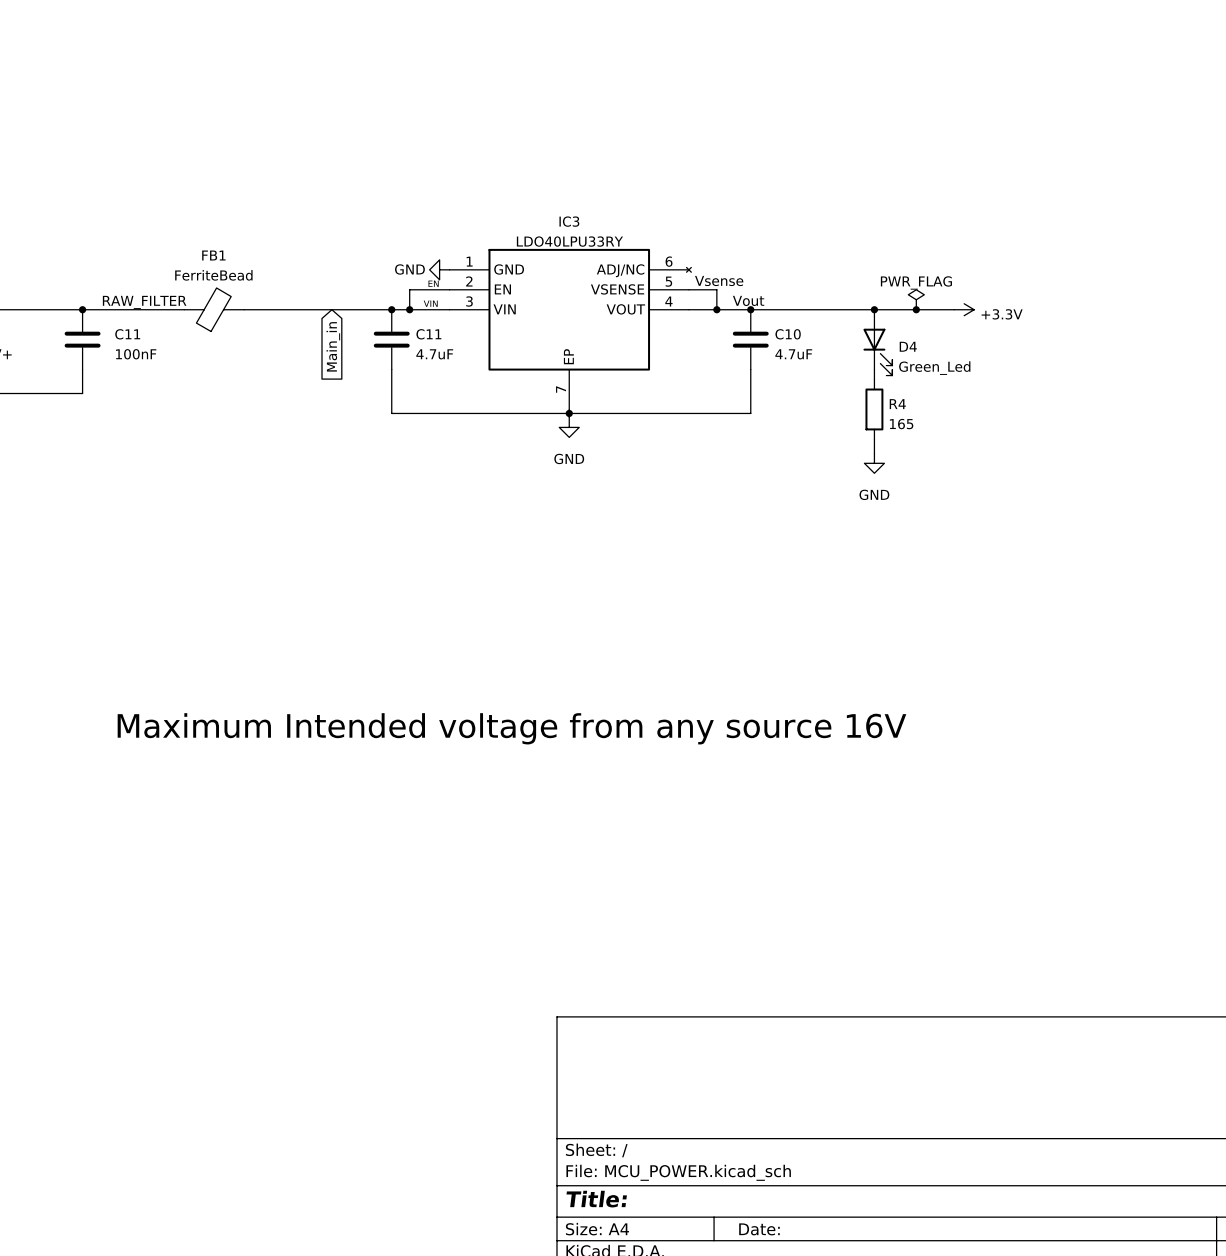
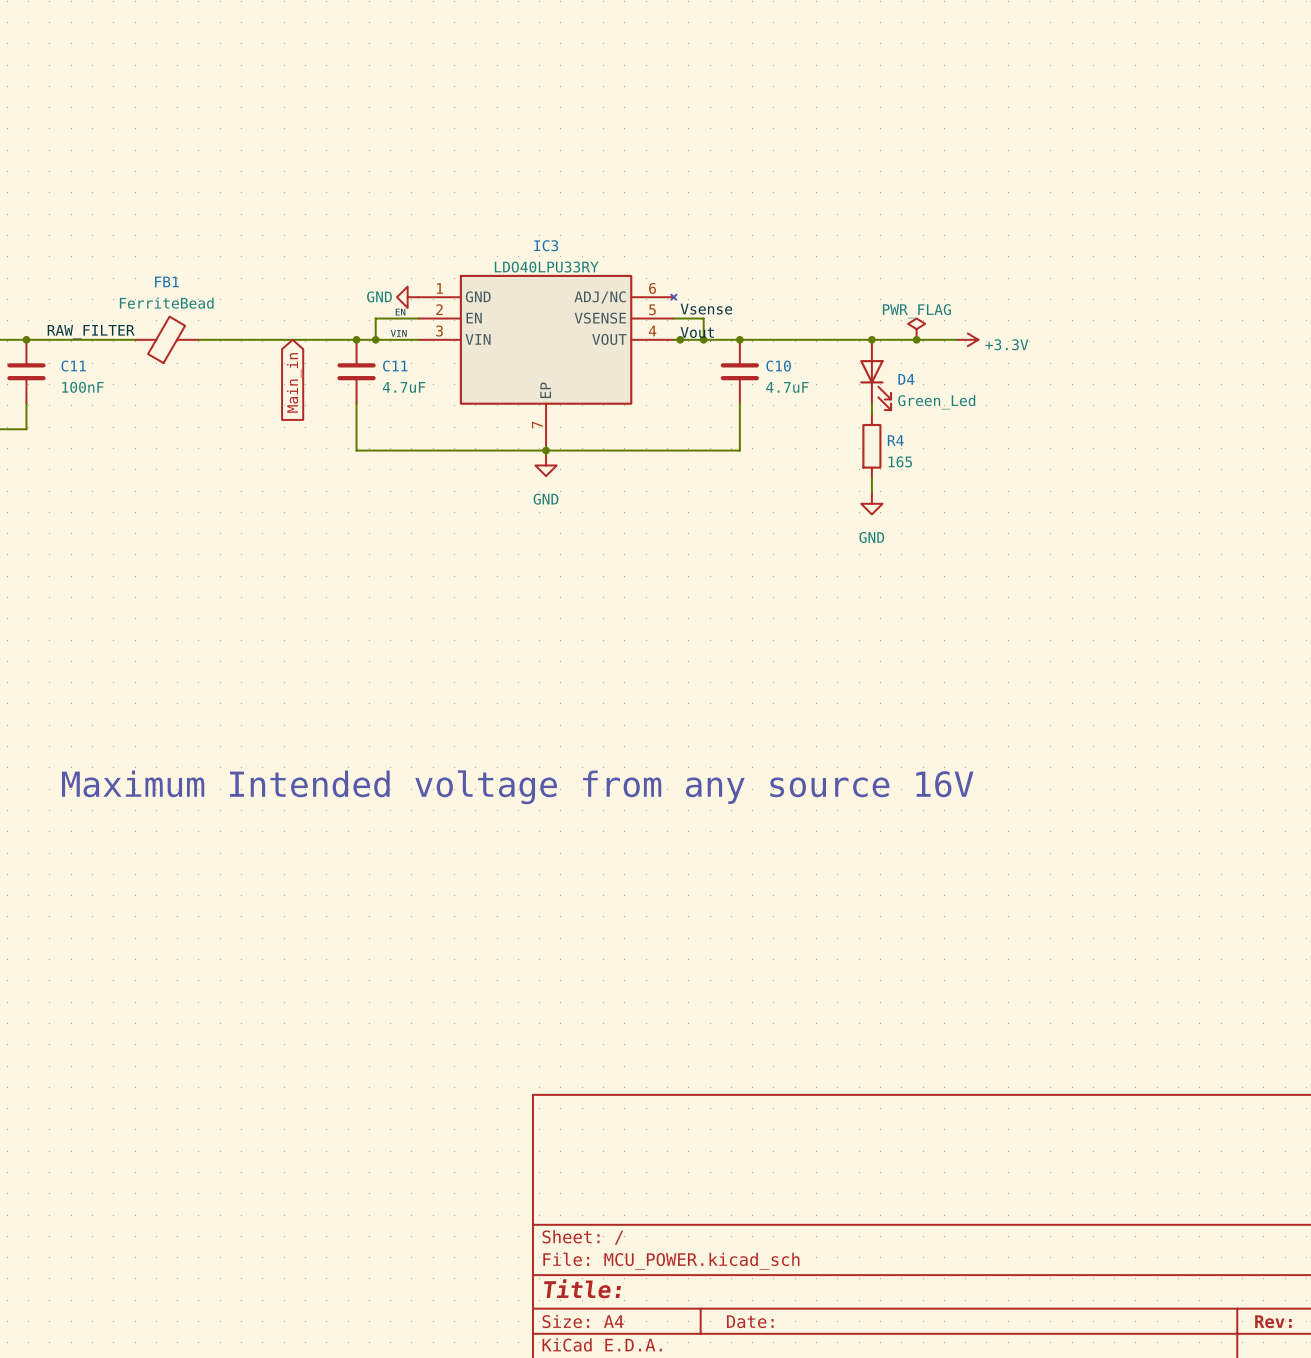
label position: Vout (748, 300) -> Vout (697, 332)
junction: none -> (680, 339)

